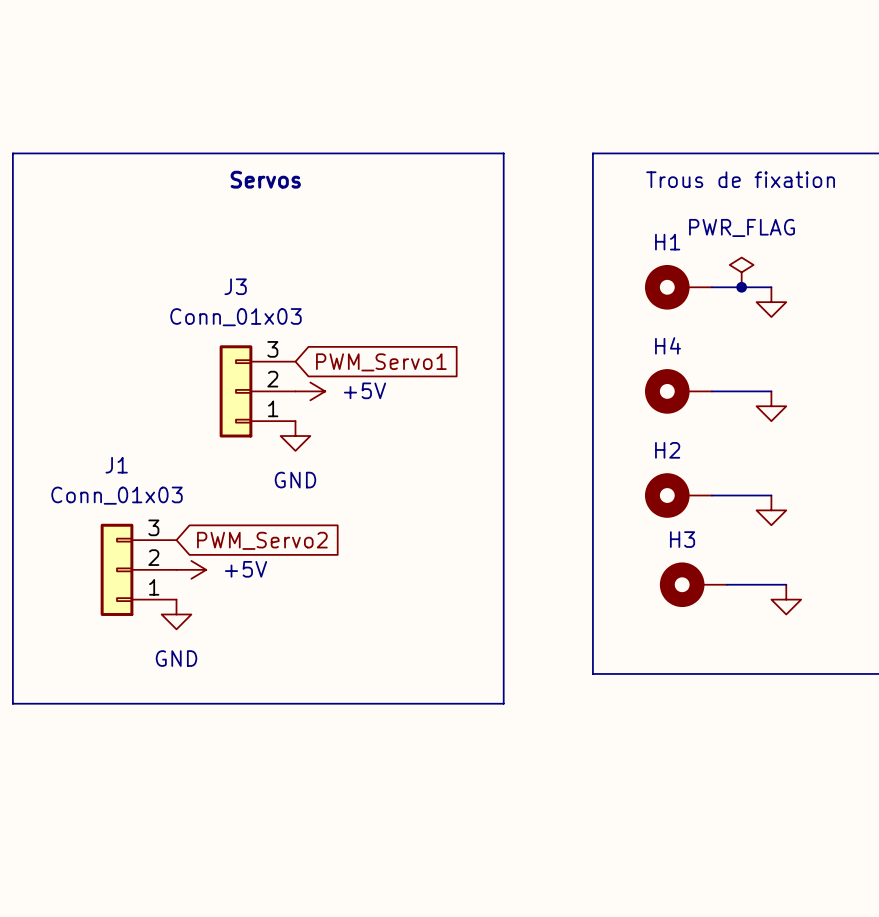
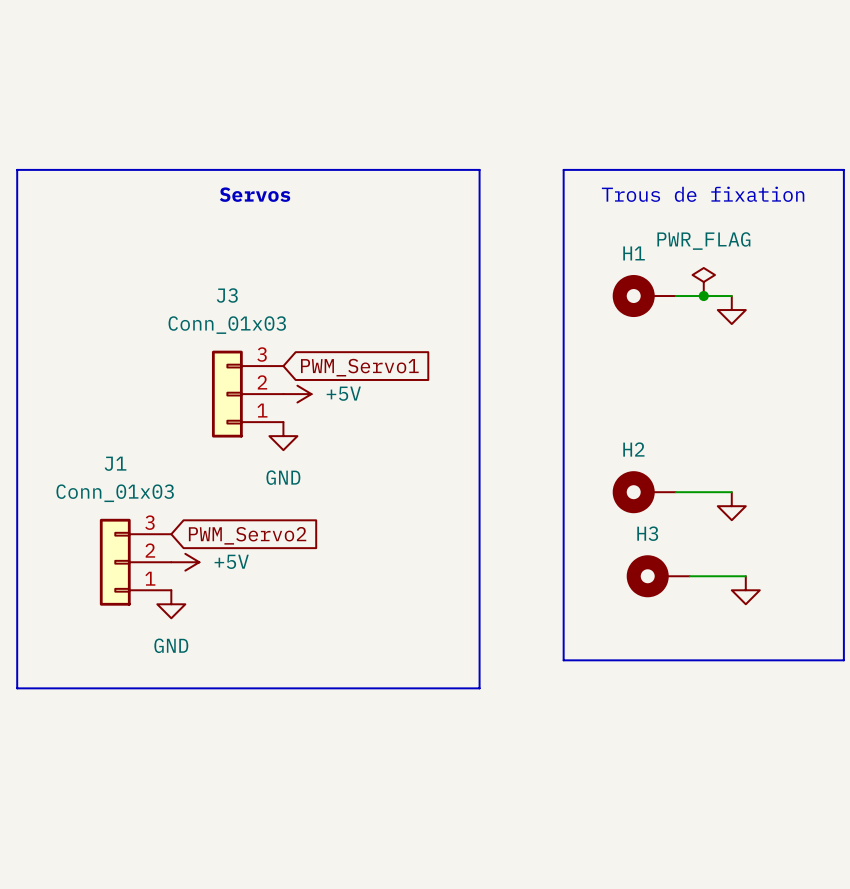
H4: (678, 391) -> none
wire: (711, 391) (771, 391) -> none
power symbol: (771, 406) -> none

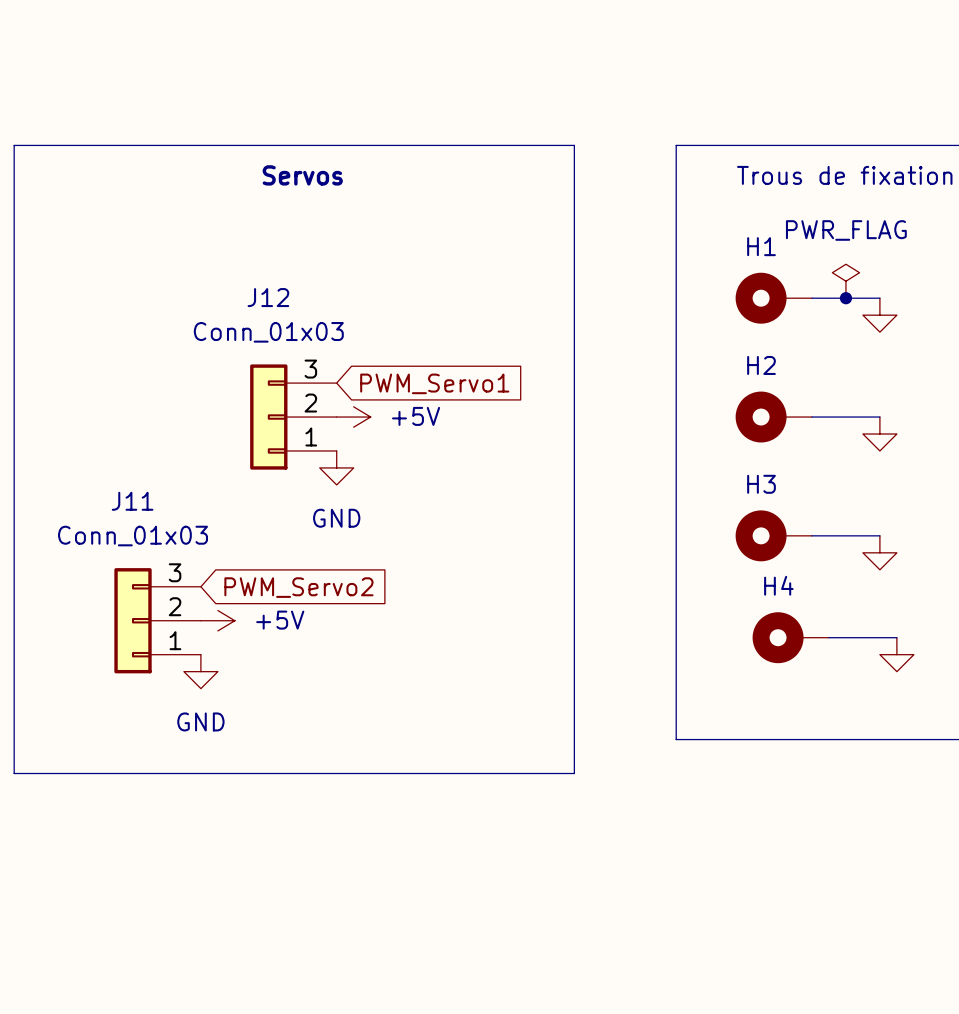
J3 name: J3 (227, 295) -> J12 (268, 297)
H2: none -> (773, 417)
wire: none -> (812, 417) (879, 417)
power symbol: none -> (879, 434)
H2 name: H2 (633, 449) -> H3 (761, 484)
J1 name: J1 (115, 463) -> J11 (132, 501)
H3 name: H3 (647, 533) -> H4 (778, 585)

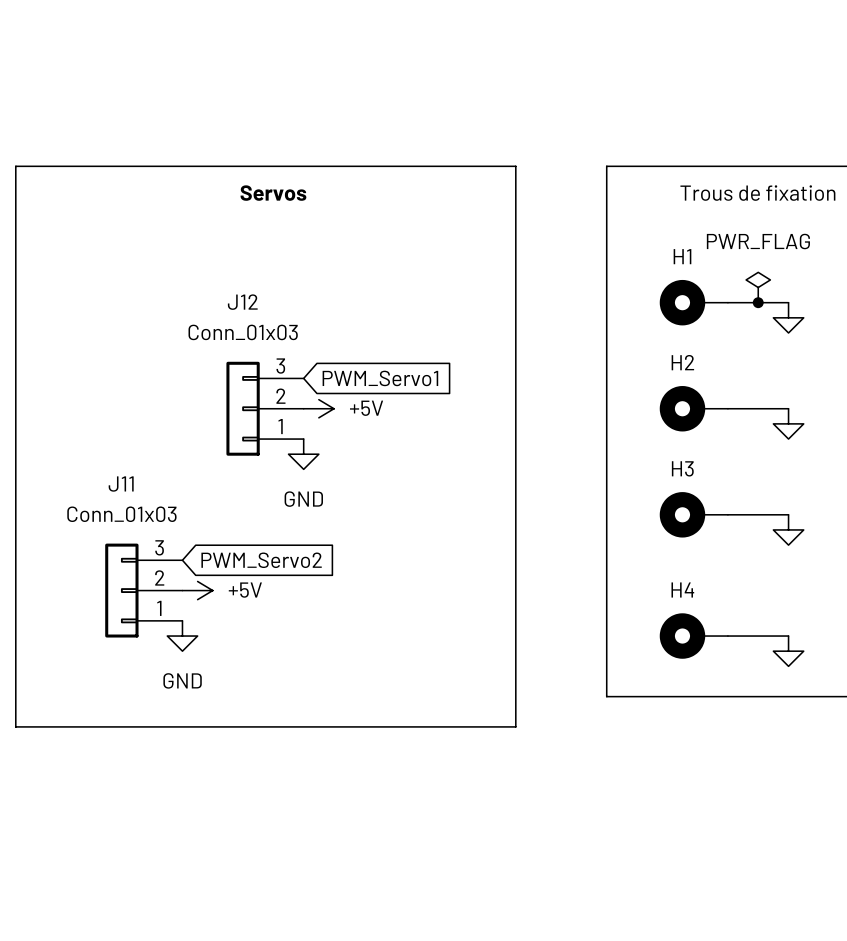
H4 position: (790, 637) -> (693, 636)
wire: (828, 637) (896, 637) -> (727, 636) (788, 636)
power symbol position: (896, 654) -> (788, 651)

